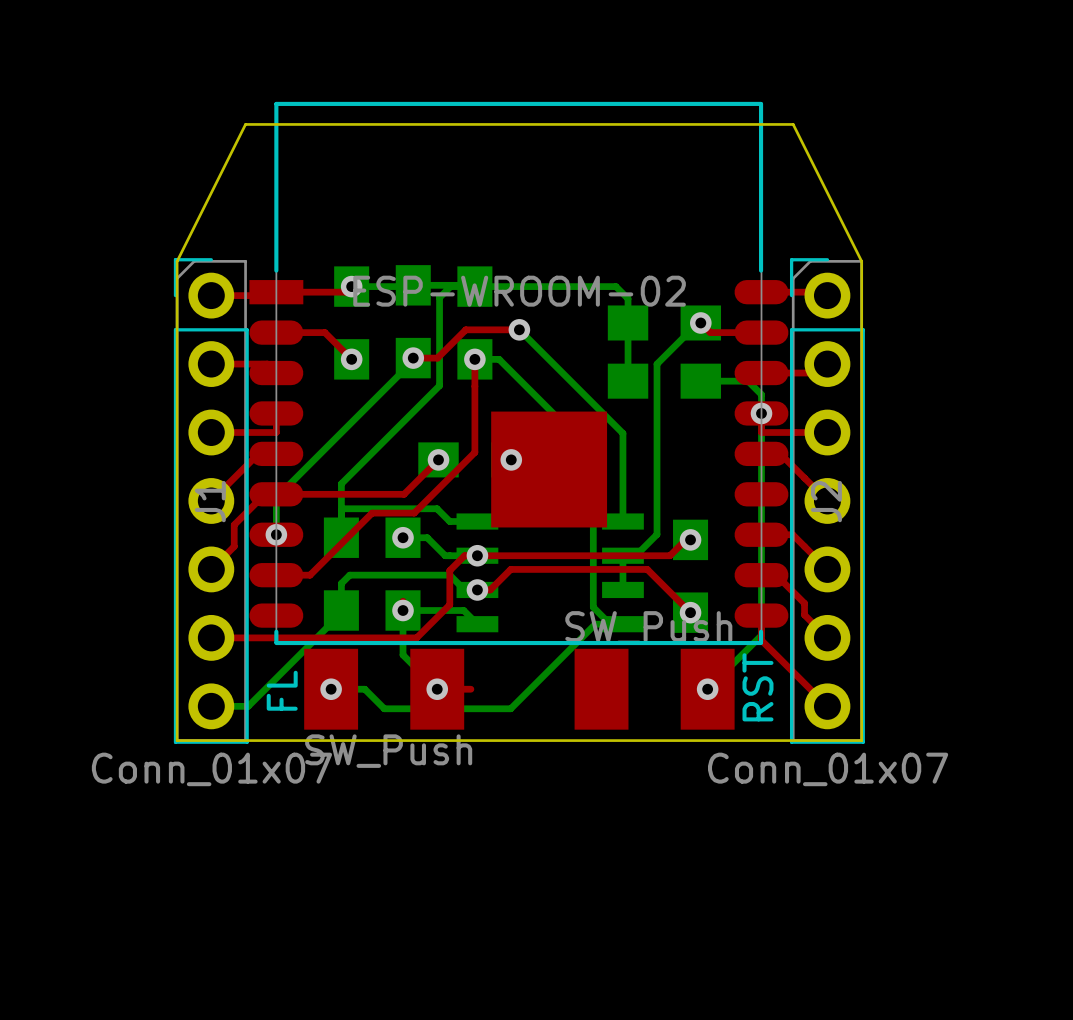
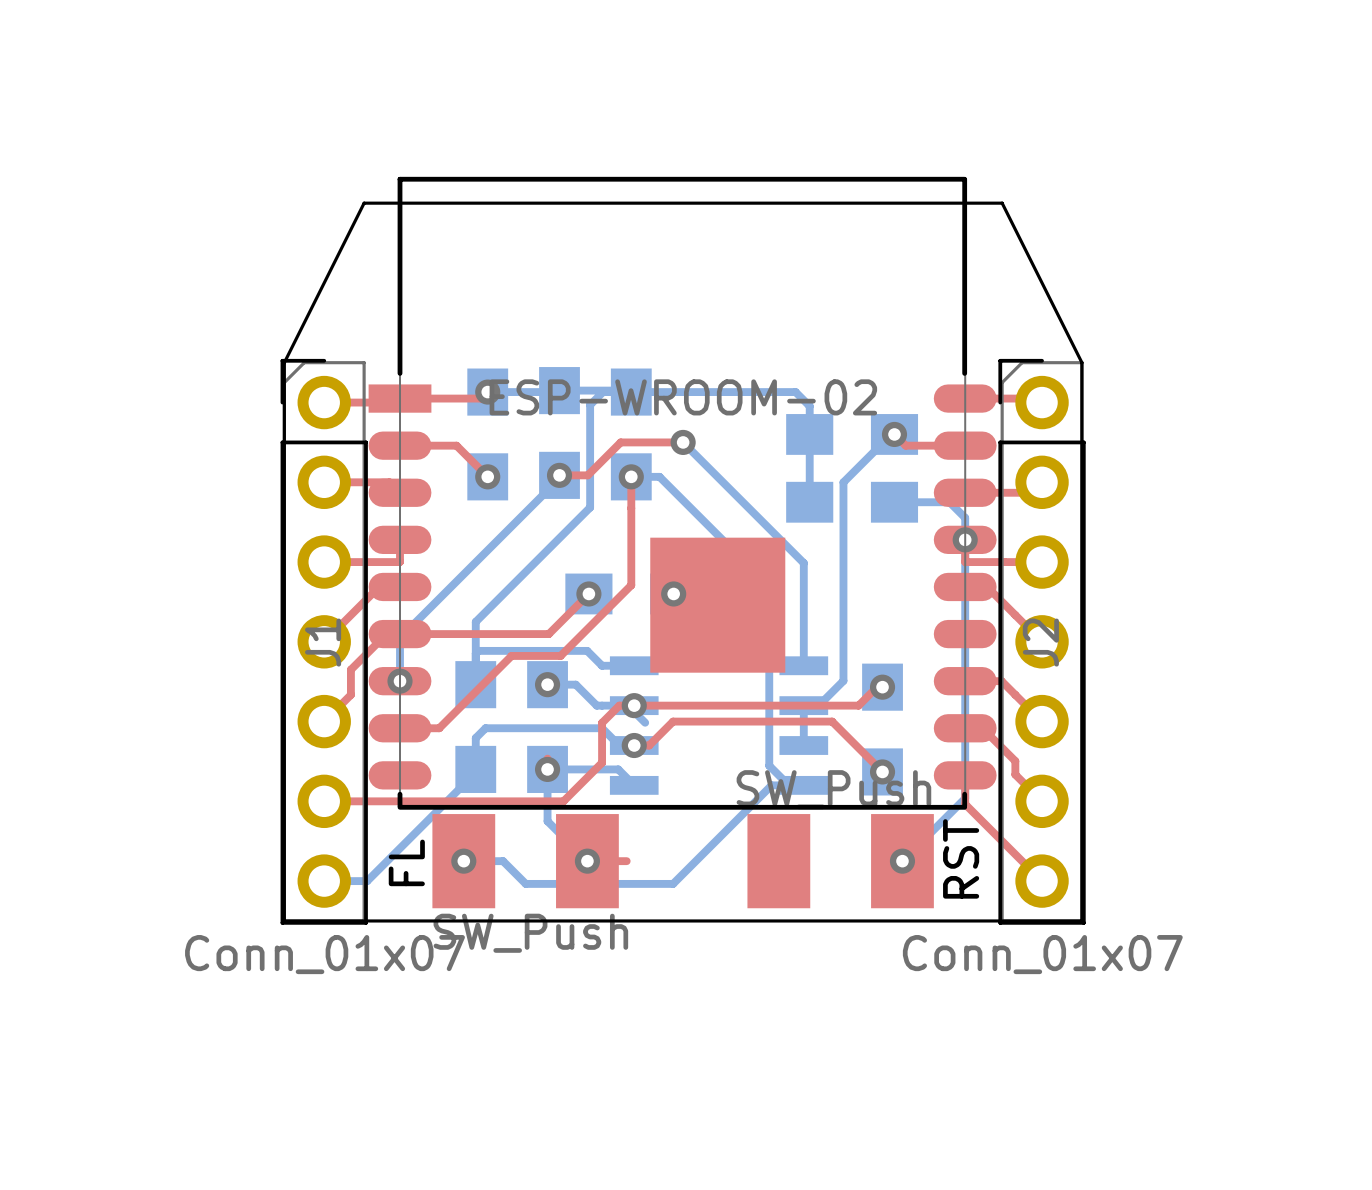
bottom track: none -> (634, 705) (634, 711) (645, 722)

